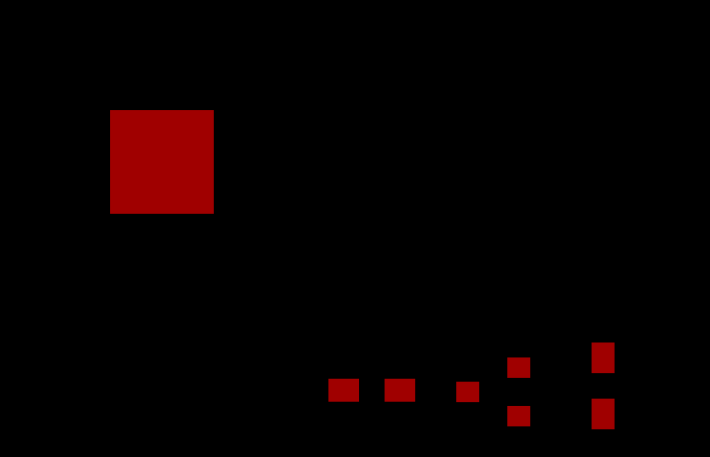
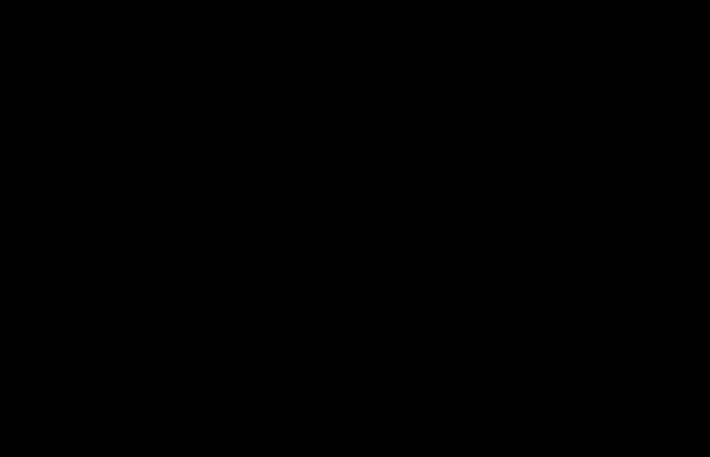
part: (161, 161) -> none
part: (603, 385) -> none
part: (371, 390) -> none
part: (493, 391) -> none

